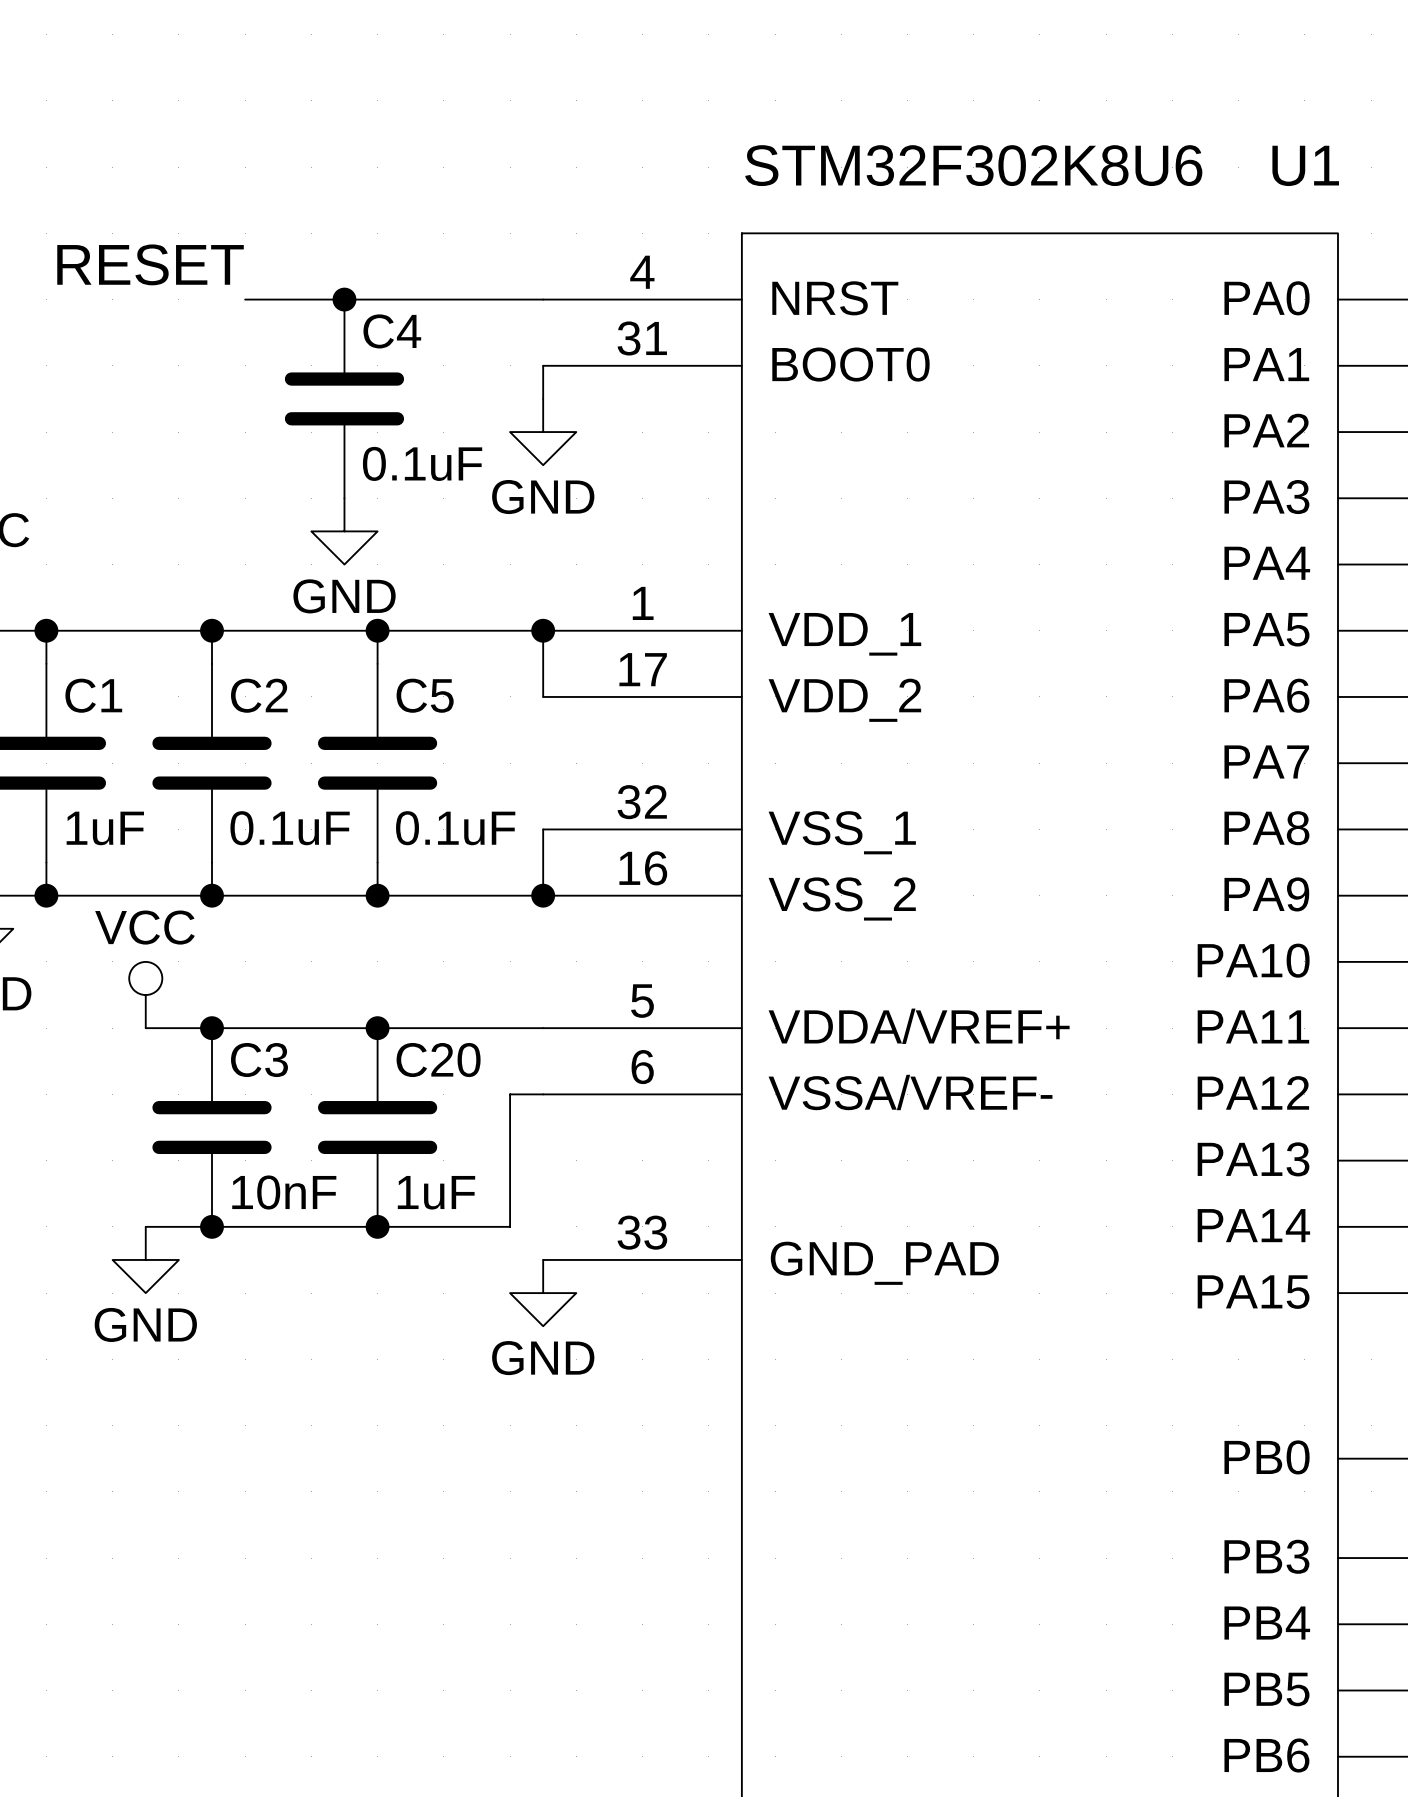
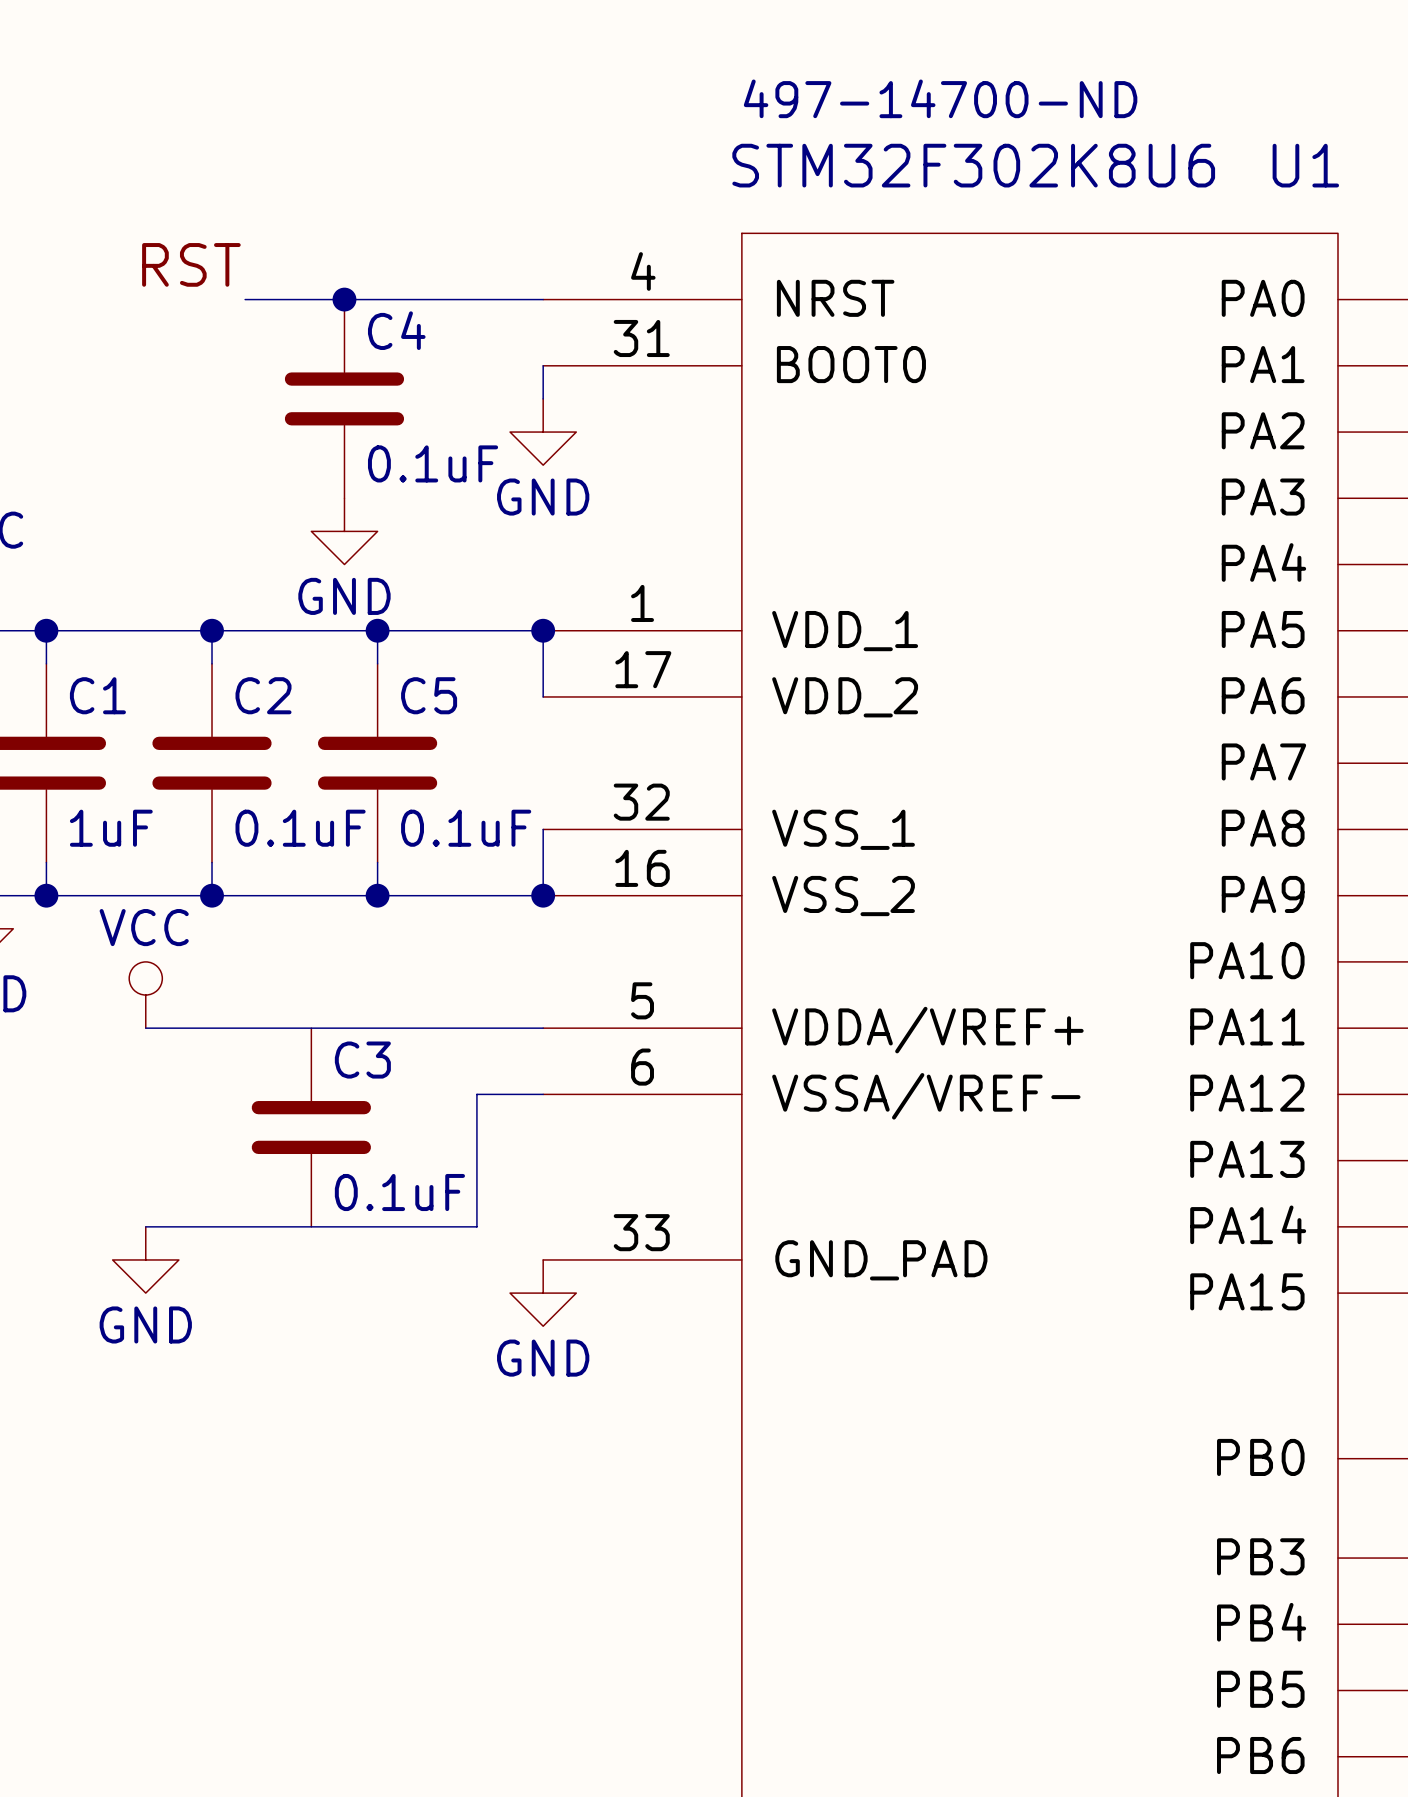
U1 text: none -> 497-14700-ND (940, 98)
label: RESET (150, 264) -> RST (191, 264)
junction: (212, 1028) -> none
junction: (377, 1028) -> none
wire: (510, 1094) (510, 1226) (476, 1226) -> (510, 1094) (476, 1094) (476, 1226)
C3 position: (212, 1127) -> (311, 1127)
C20: 1uF (377, 1127) -> none
C3 value: 10nF (284, 1192) -> 0.1uF (399, 1192)
junction: (212, 1226) -> none
junction: (377, 1226) -> none

